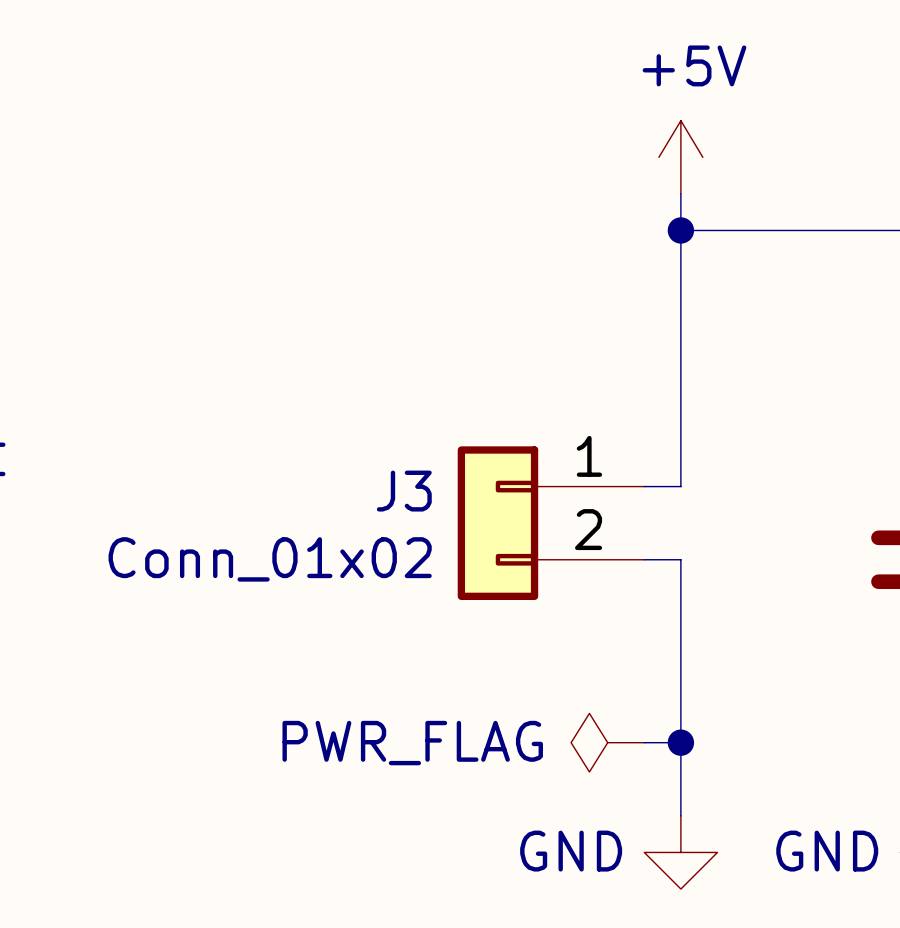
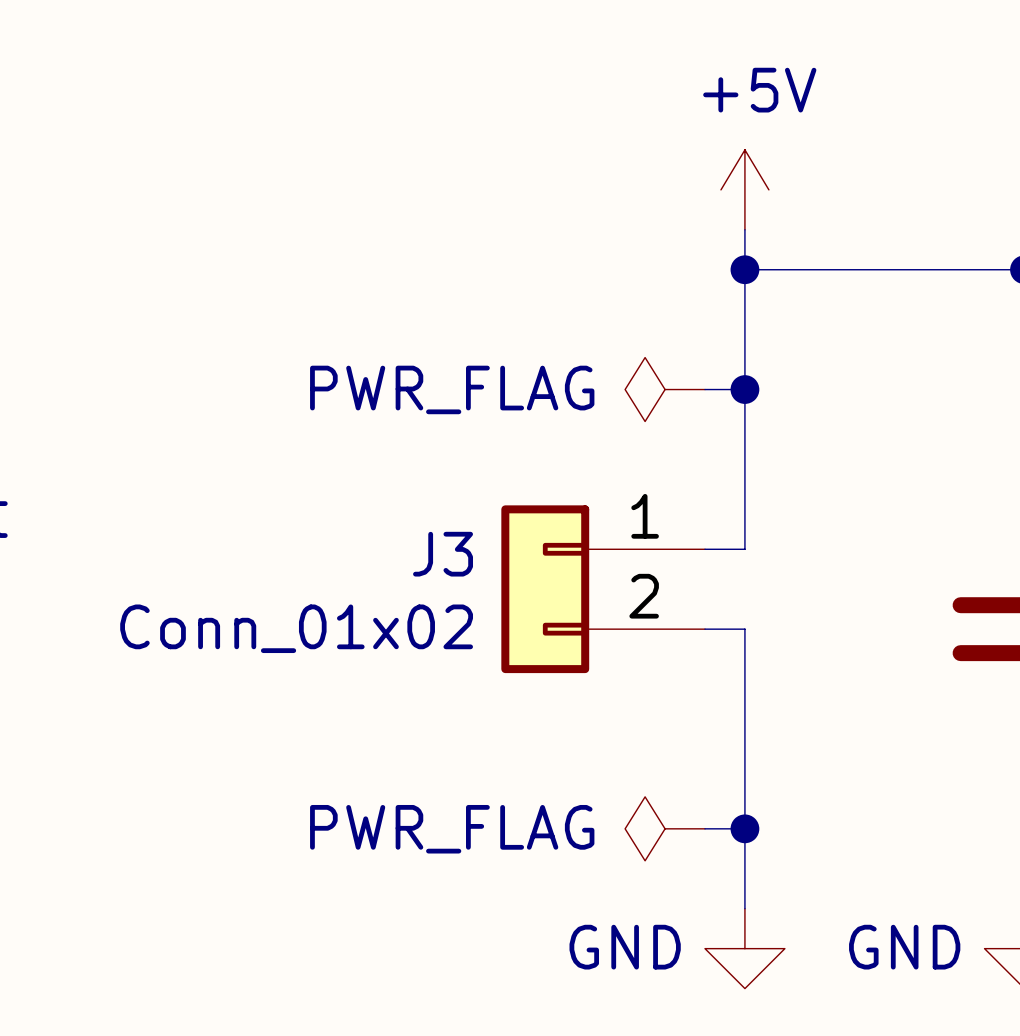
power symbol: none -> PWR_FLAG (665, 389)
wire: none -> (705, 389) (744, 389)
junction: none -> (744, 389)

